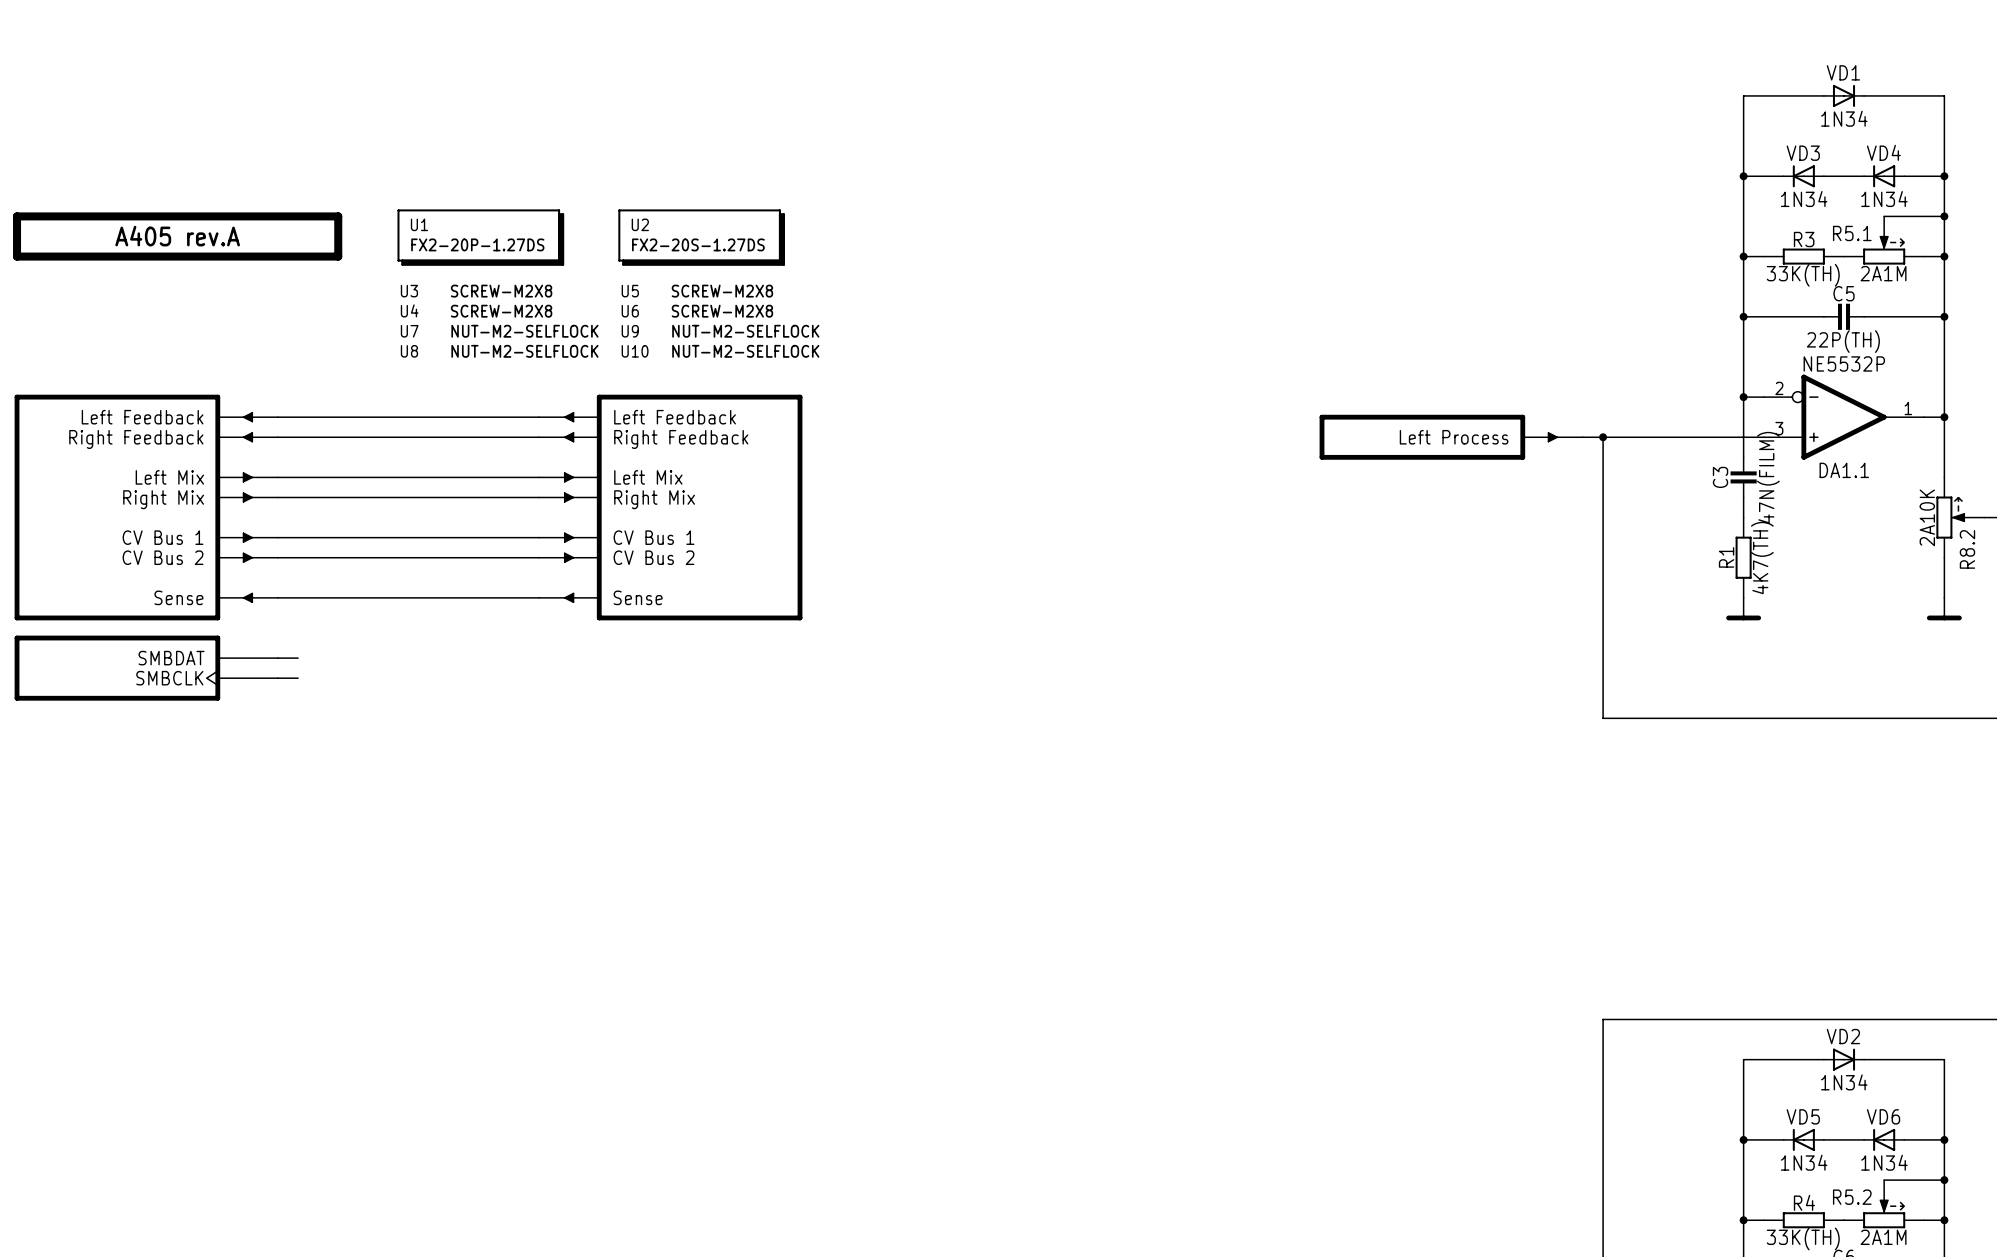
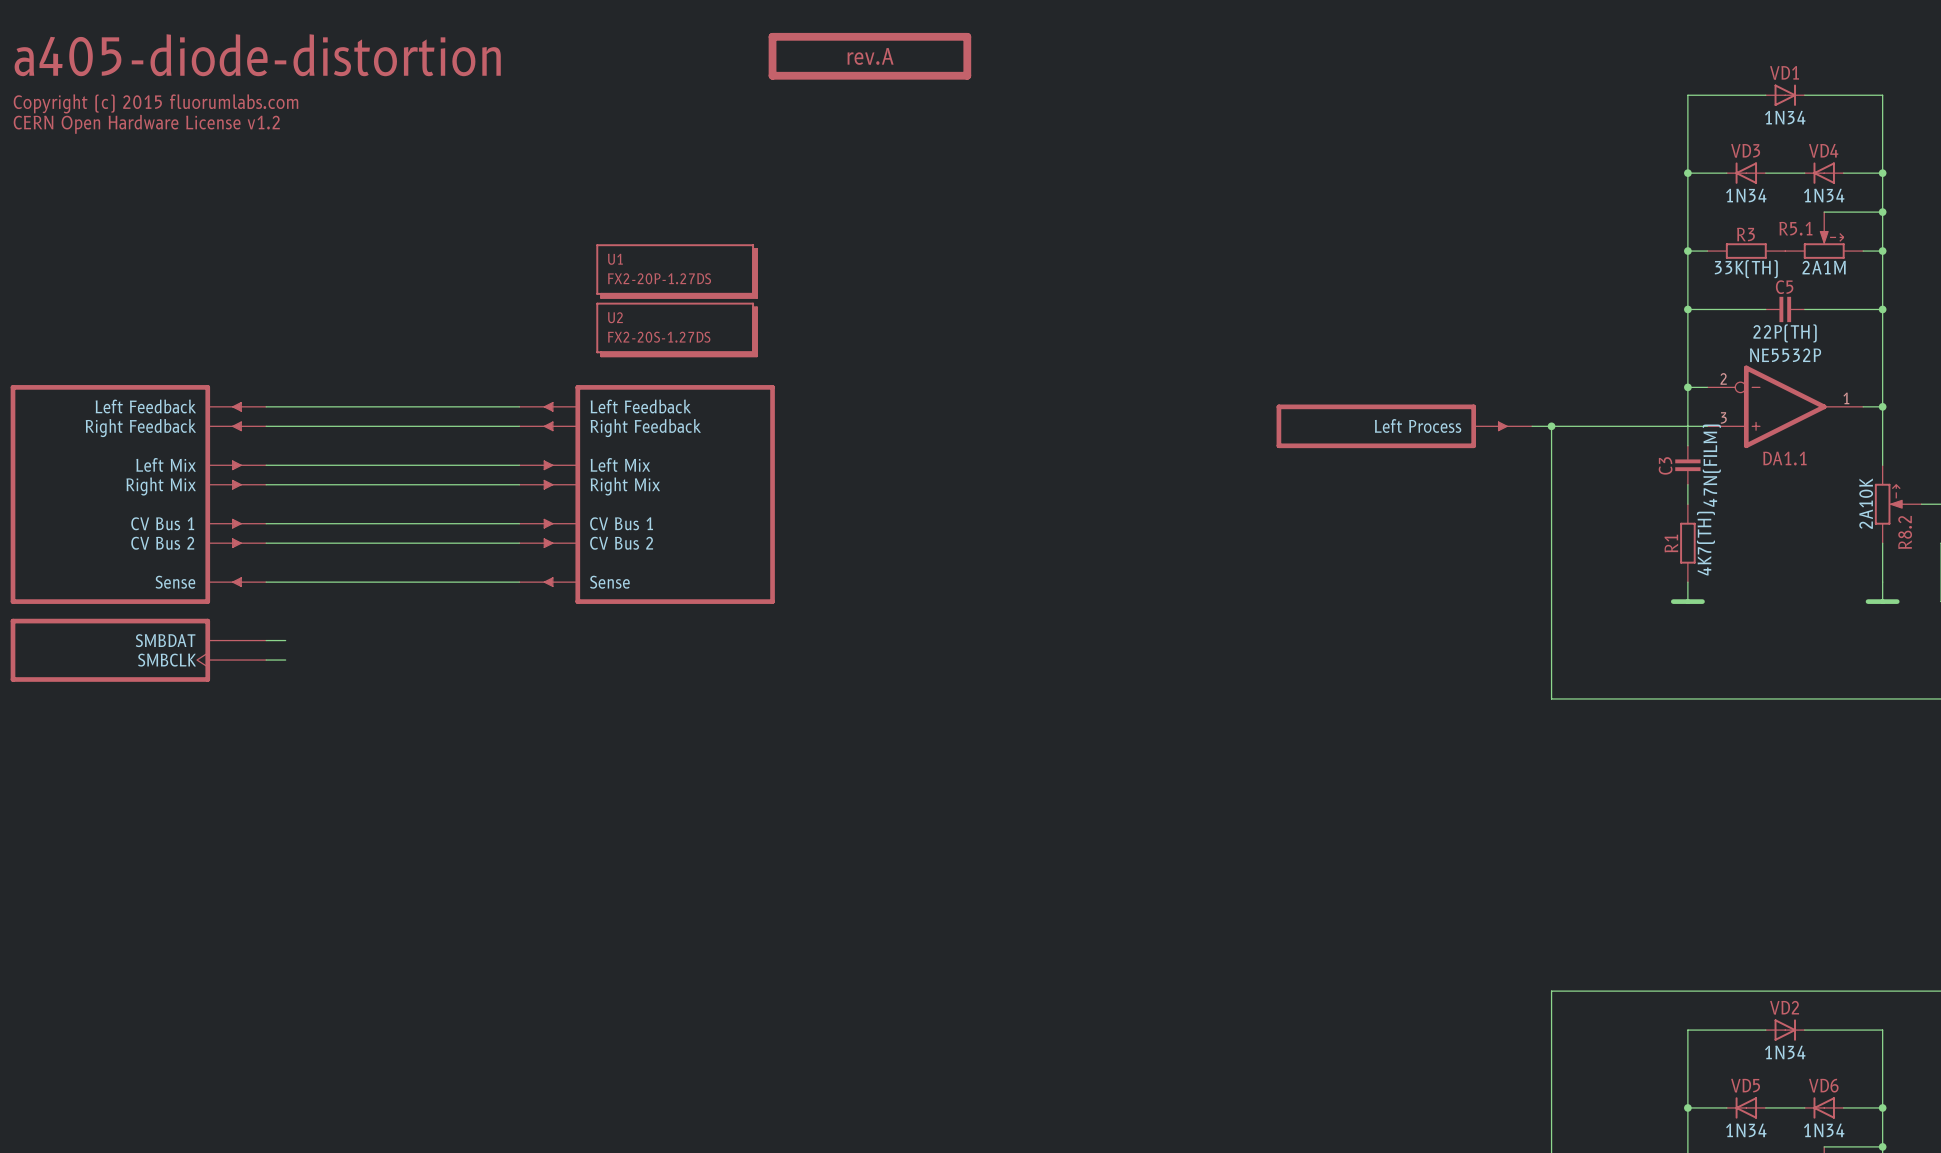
part: none -> rev.A (869, 56)
part: none -> (257, 84)
part: A405 rev.A (177, 236) -> none
U1 position: (480, 237) -> (677, 271)
U2 position: (701, 237) -> (677, 329)
U3: SCREW-M2X8 (476, 291) -> none
U5: SCREW-M2X8 (697, 291) -> none
U4: SCREW-M2X8 (476, 311) -> none
U6: SCREW-M2X8 (697, 311) -> none
U7: NUT-M2-SELFLOCK (499, 331) -> none
U9: NUT-M2-SELFLOCK (720, 331) -> none
U8: NUT-M2-SELFLOCK (499, 351) -> none
U10: NUT-M2-SELFLOCK (720, 351) -> none

